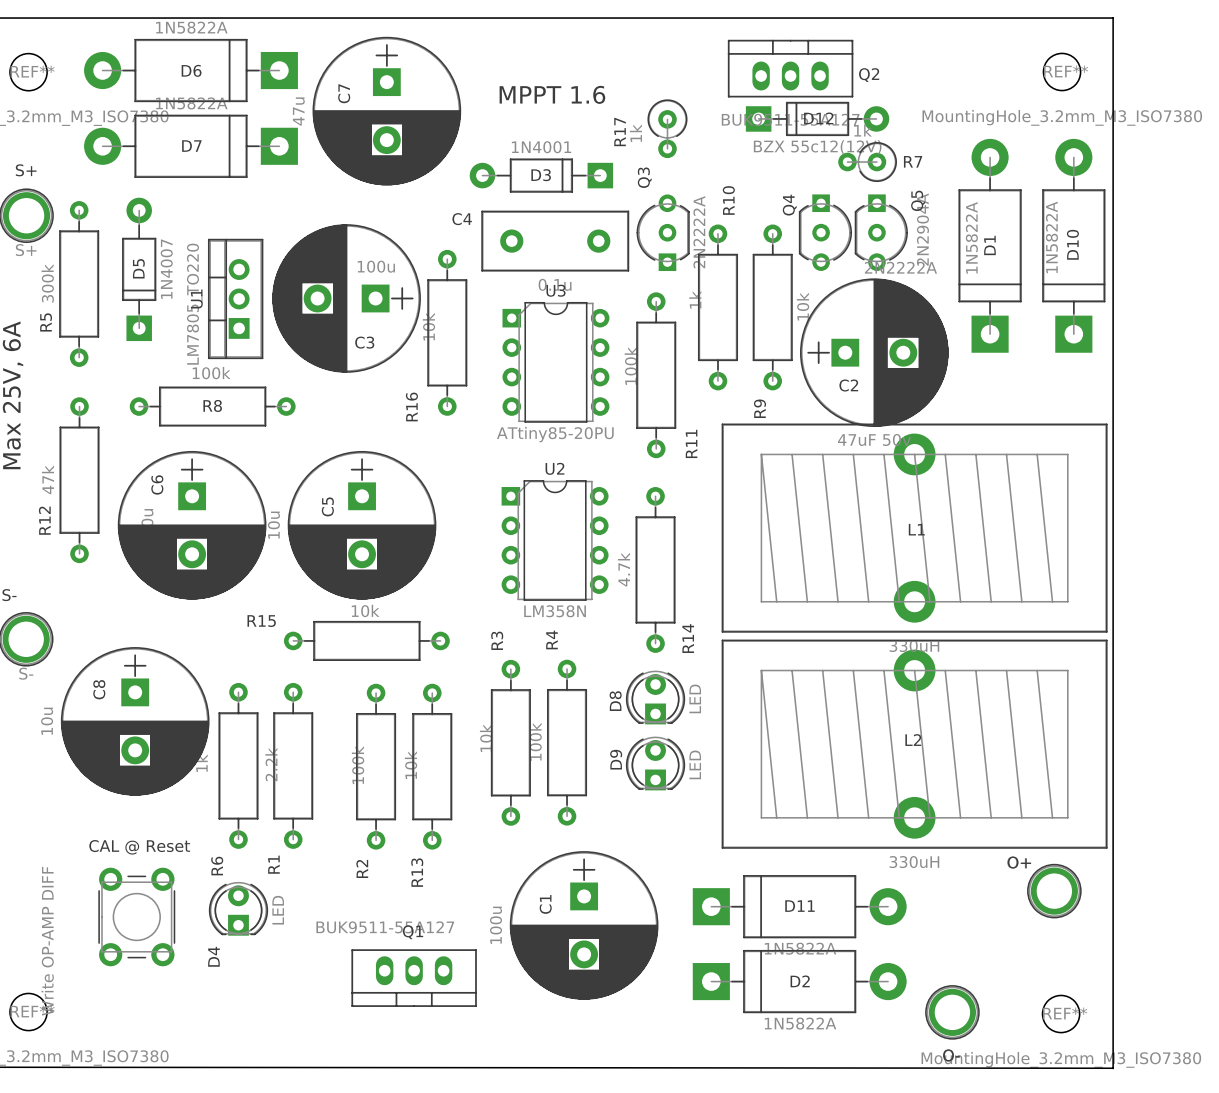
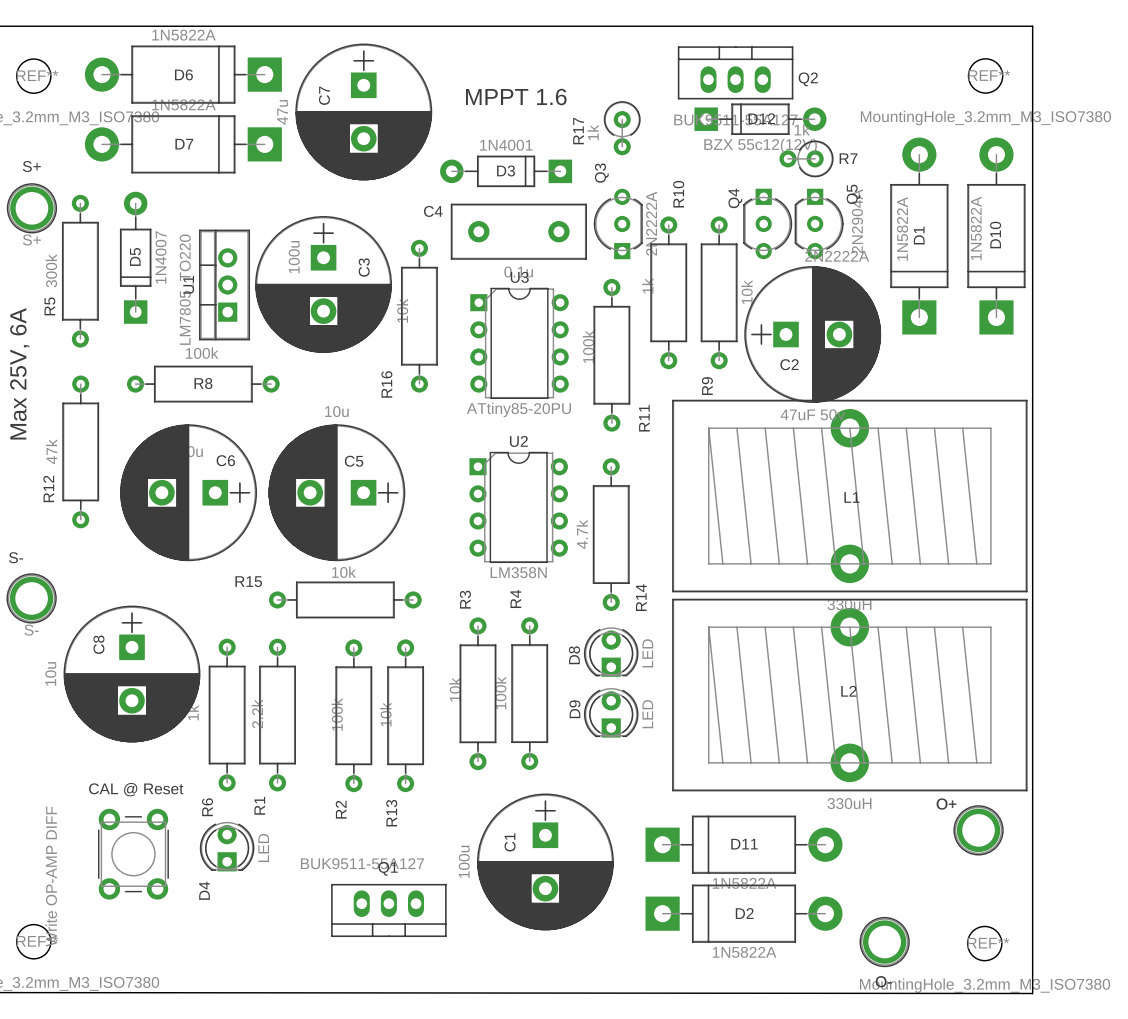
C3 rotation: 0° (346, 298) -> 90° counterclockwise (323, 284)
C6 rotation: 0° (192, 525) -> 90° clockwise (188, 492)
C5 rotation: 0° (362, 525) -> 90° clockwise (336, 492)

